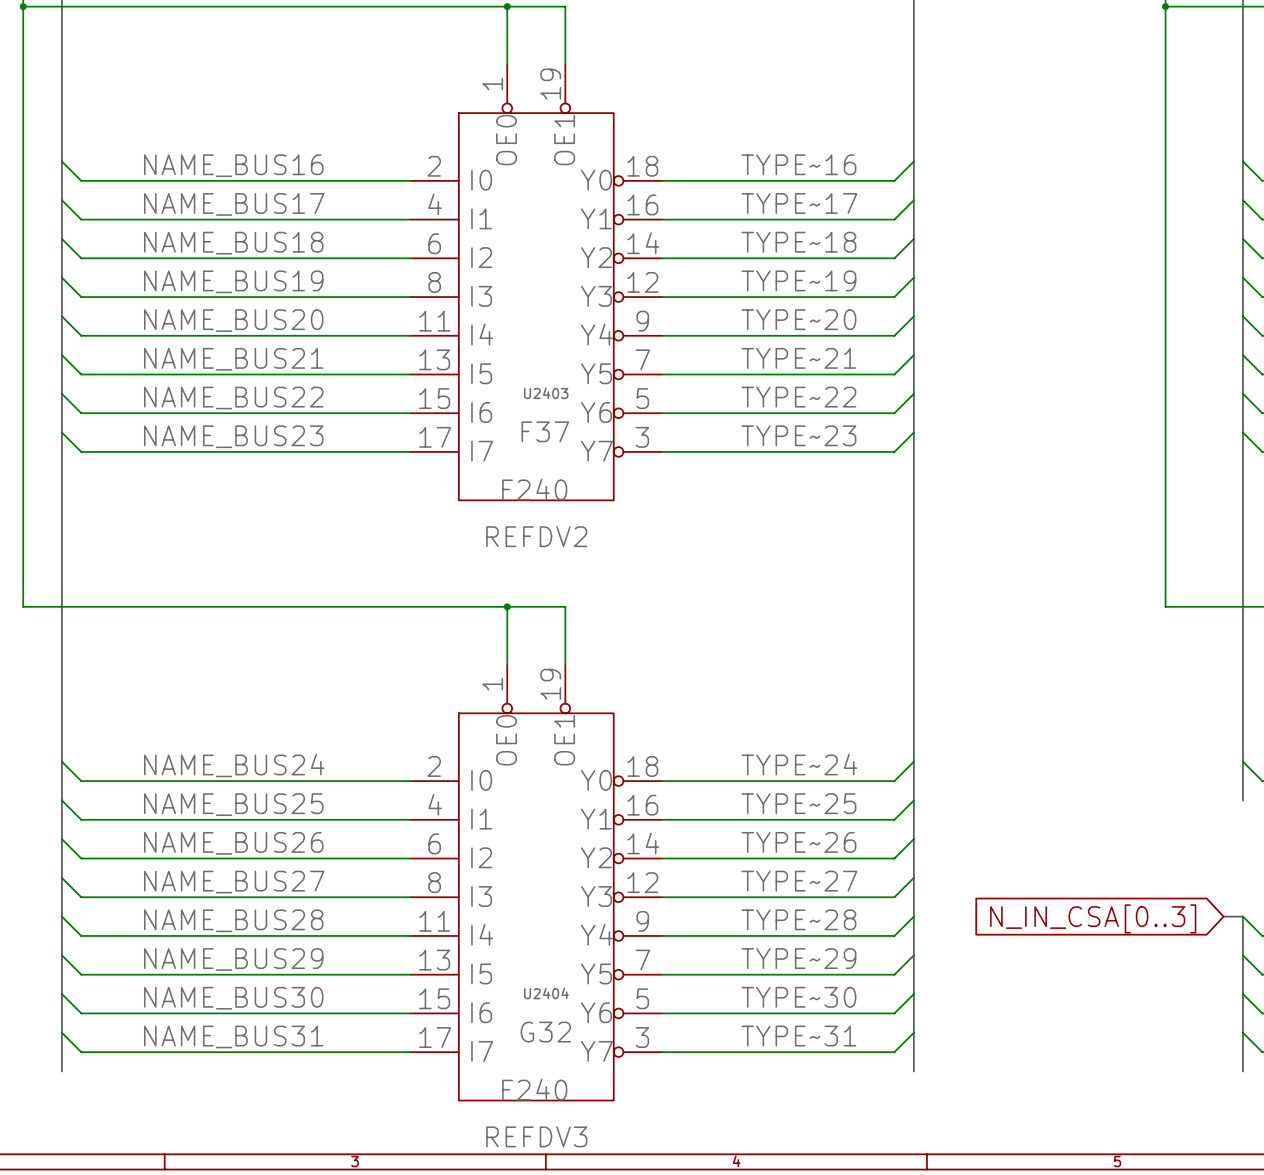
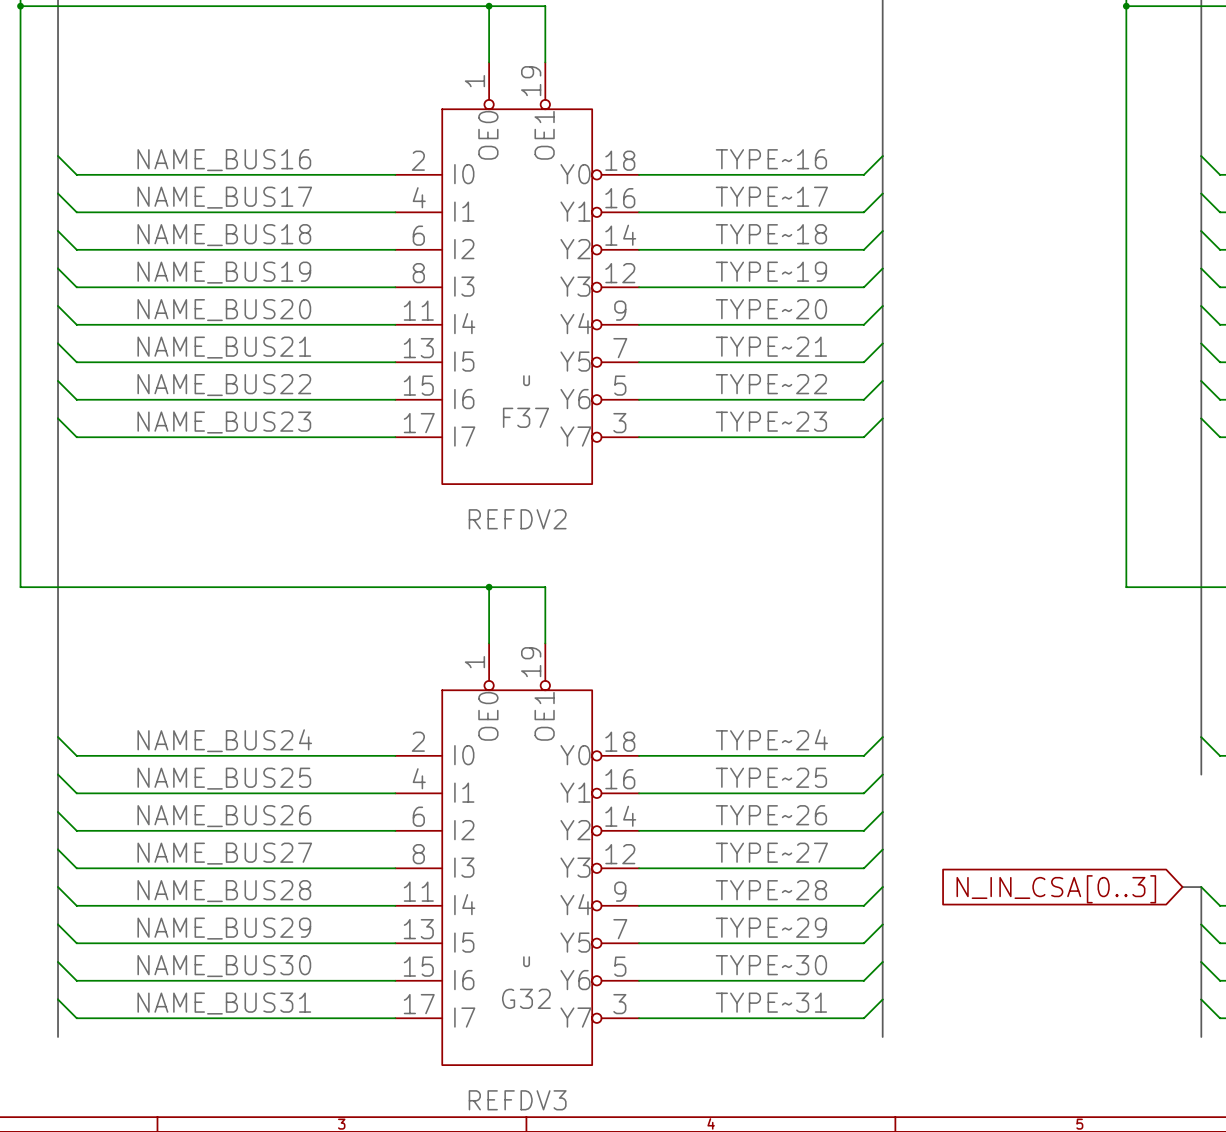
U2403 name: U2403 (546, 393) -> U (526, 380)
U2403 value: F240 (534, 489) -> none
U2404 name: U2404 (546, 993) -> U (526, 961)
U2404 value: F240 (534, 1089) -> none

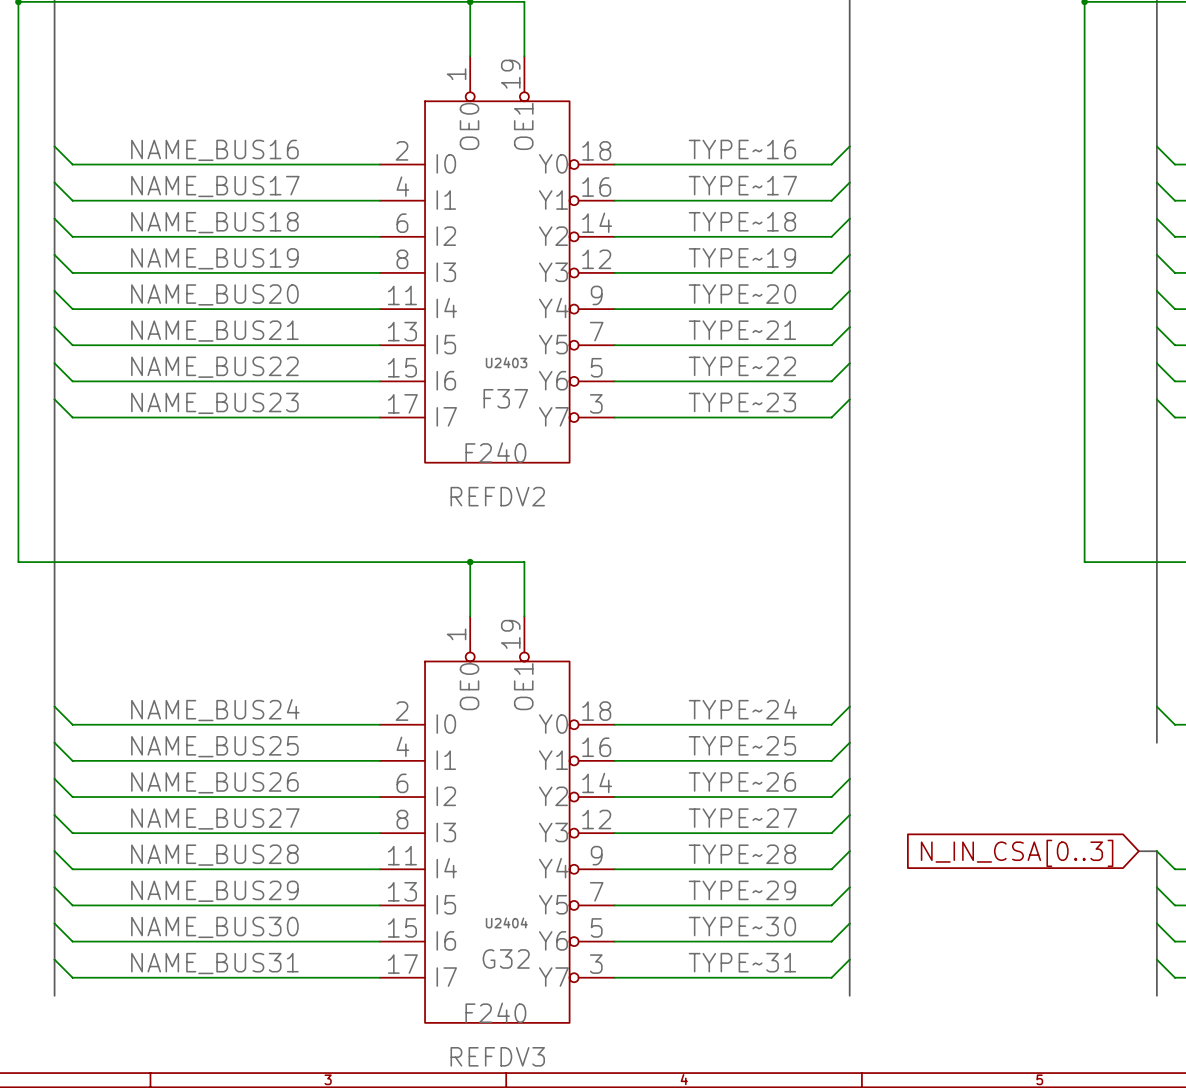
U name: U (526, 380) -> U2403 (506, 362)
U value: none -> F240 (495, 452)
U name: U (526, 961) -> U2404 (506, 922)
U value: none -> F240 (495, 1012)

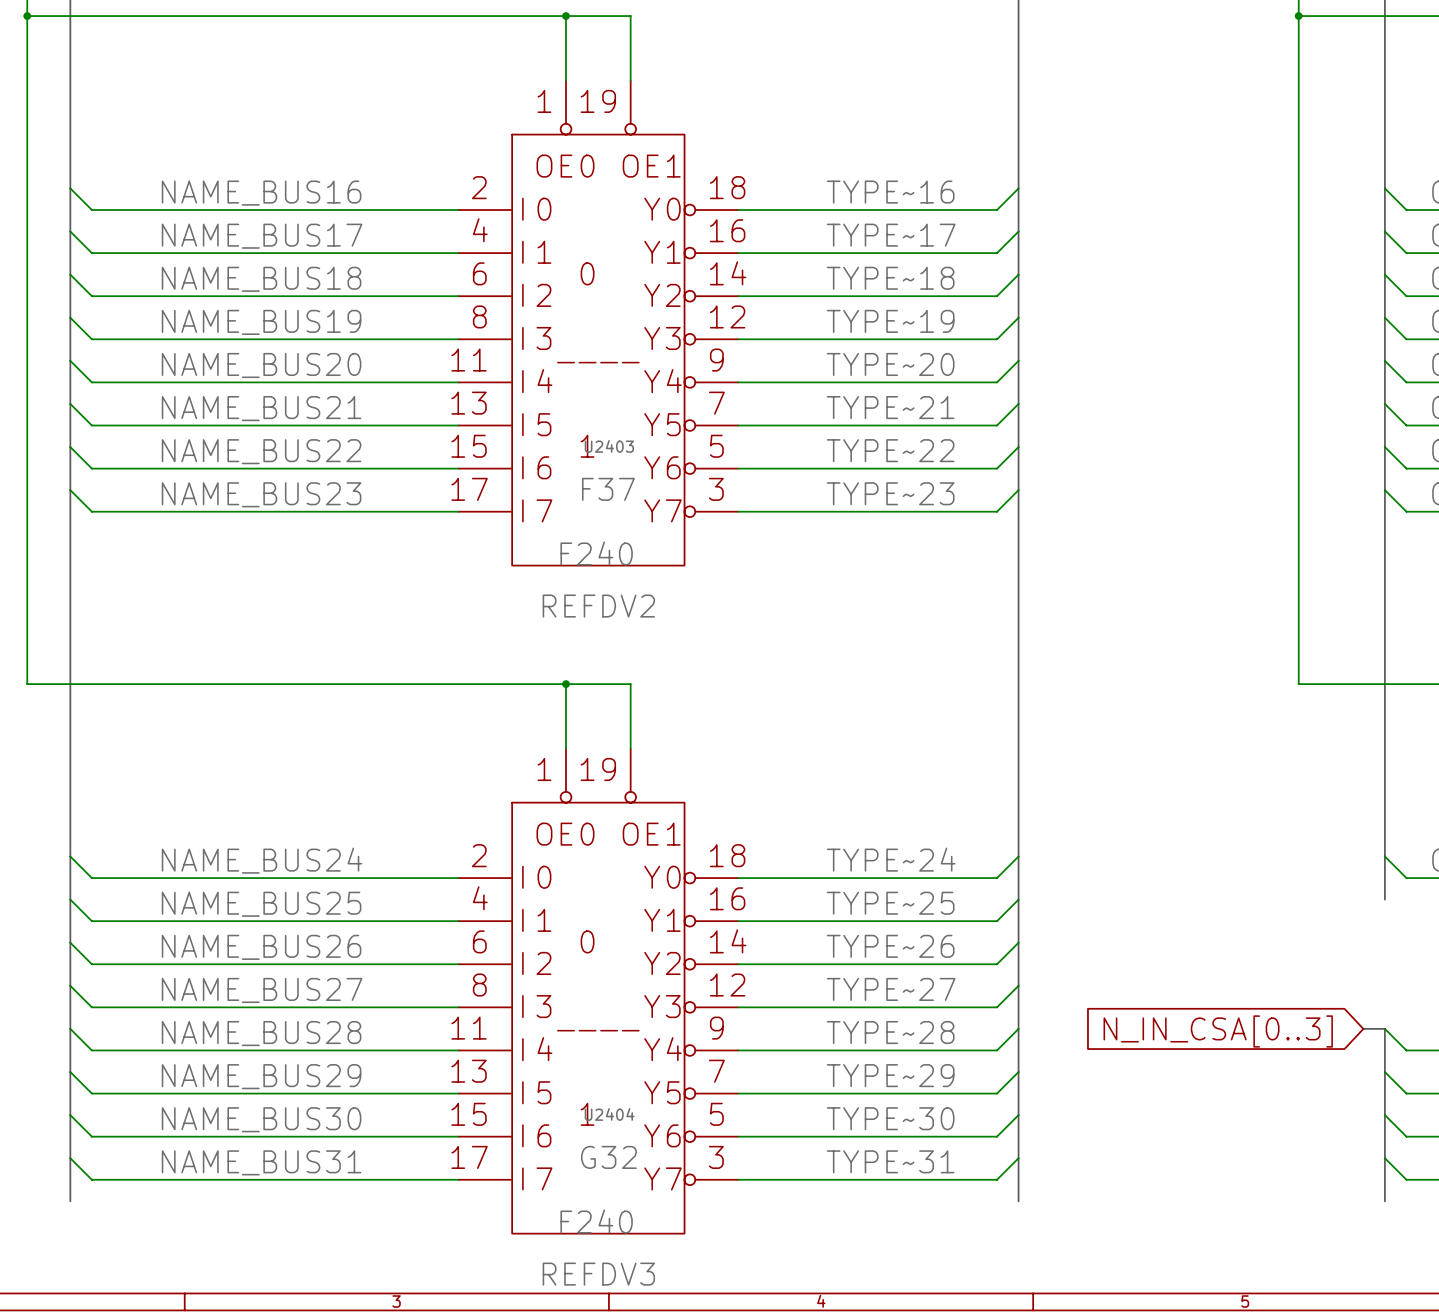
U2403 symbol: [379, 56, 615, 463] -> [458, 80, 739, 566]
U2404 symbol: [379, 616, 615, 1023] -> [458, 748, 739, 1234]

